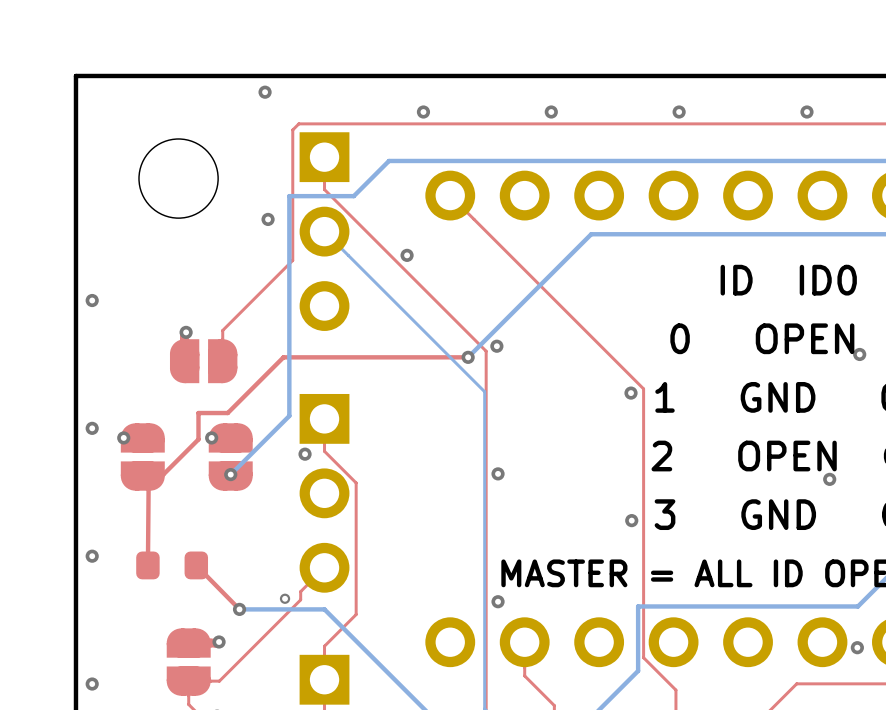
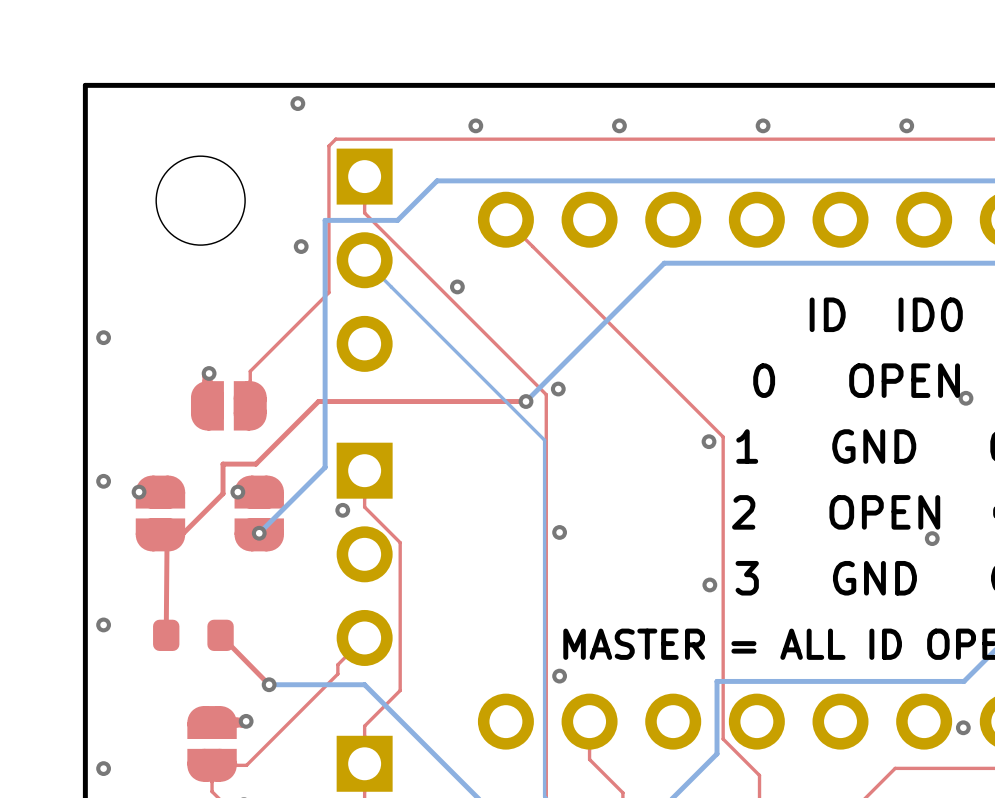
via: (285, 598) -> none

